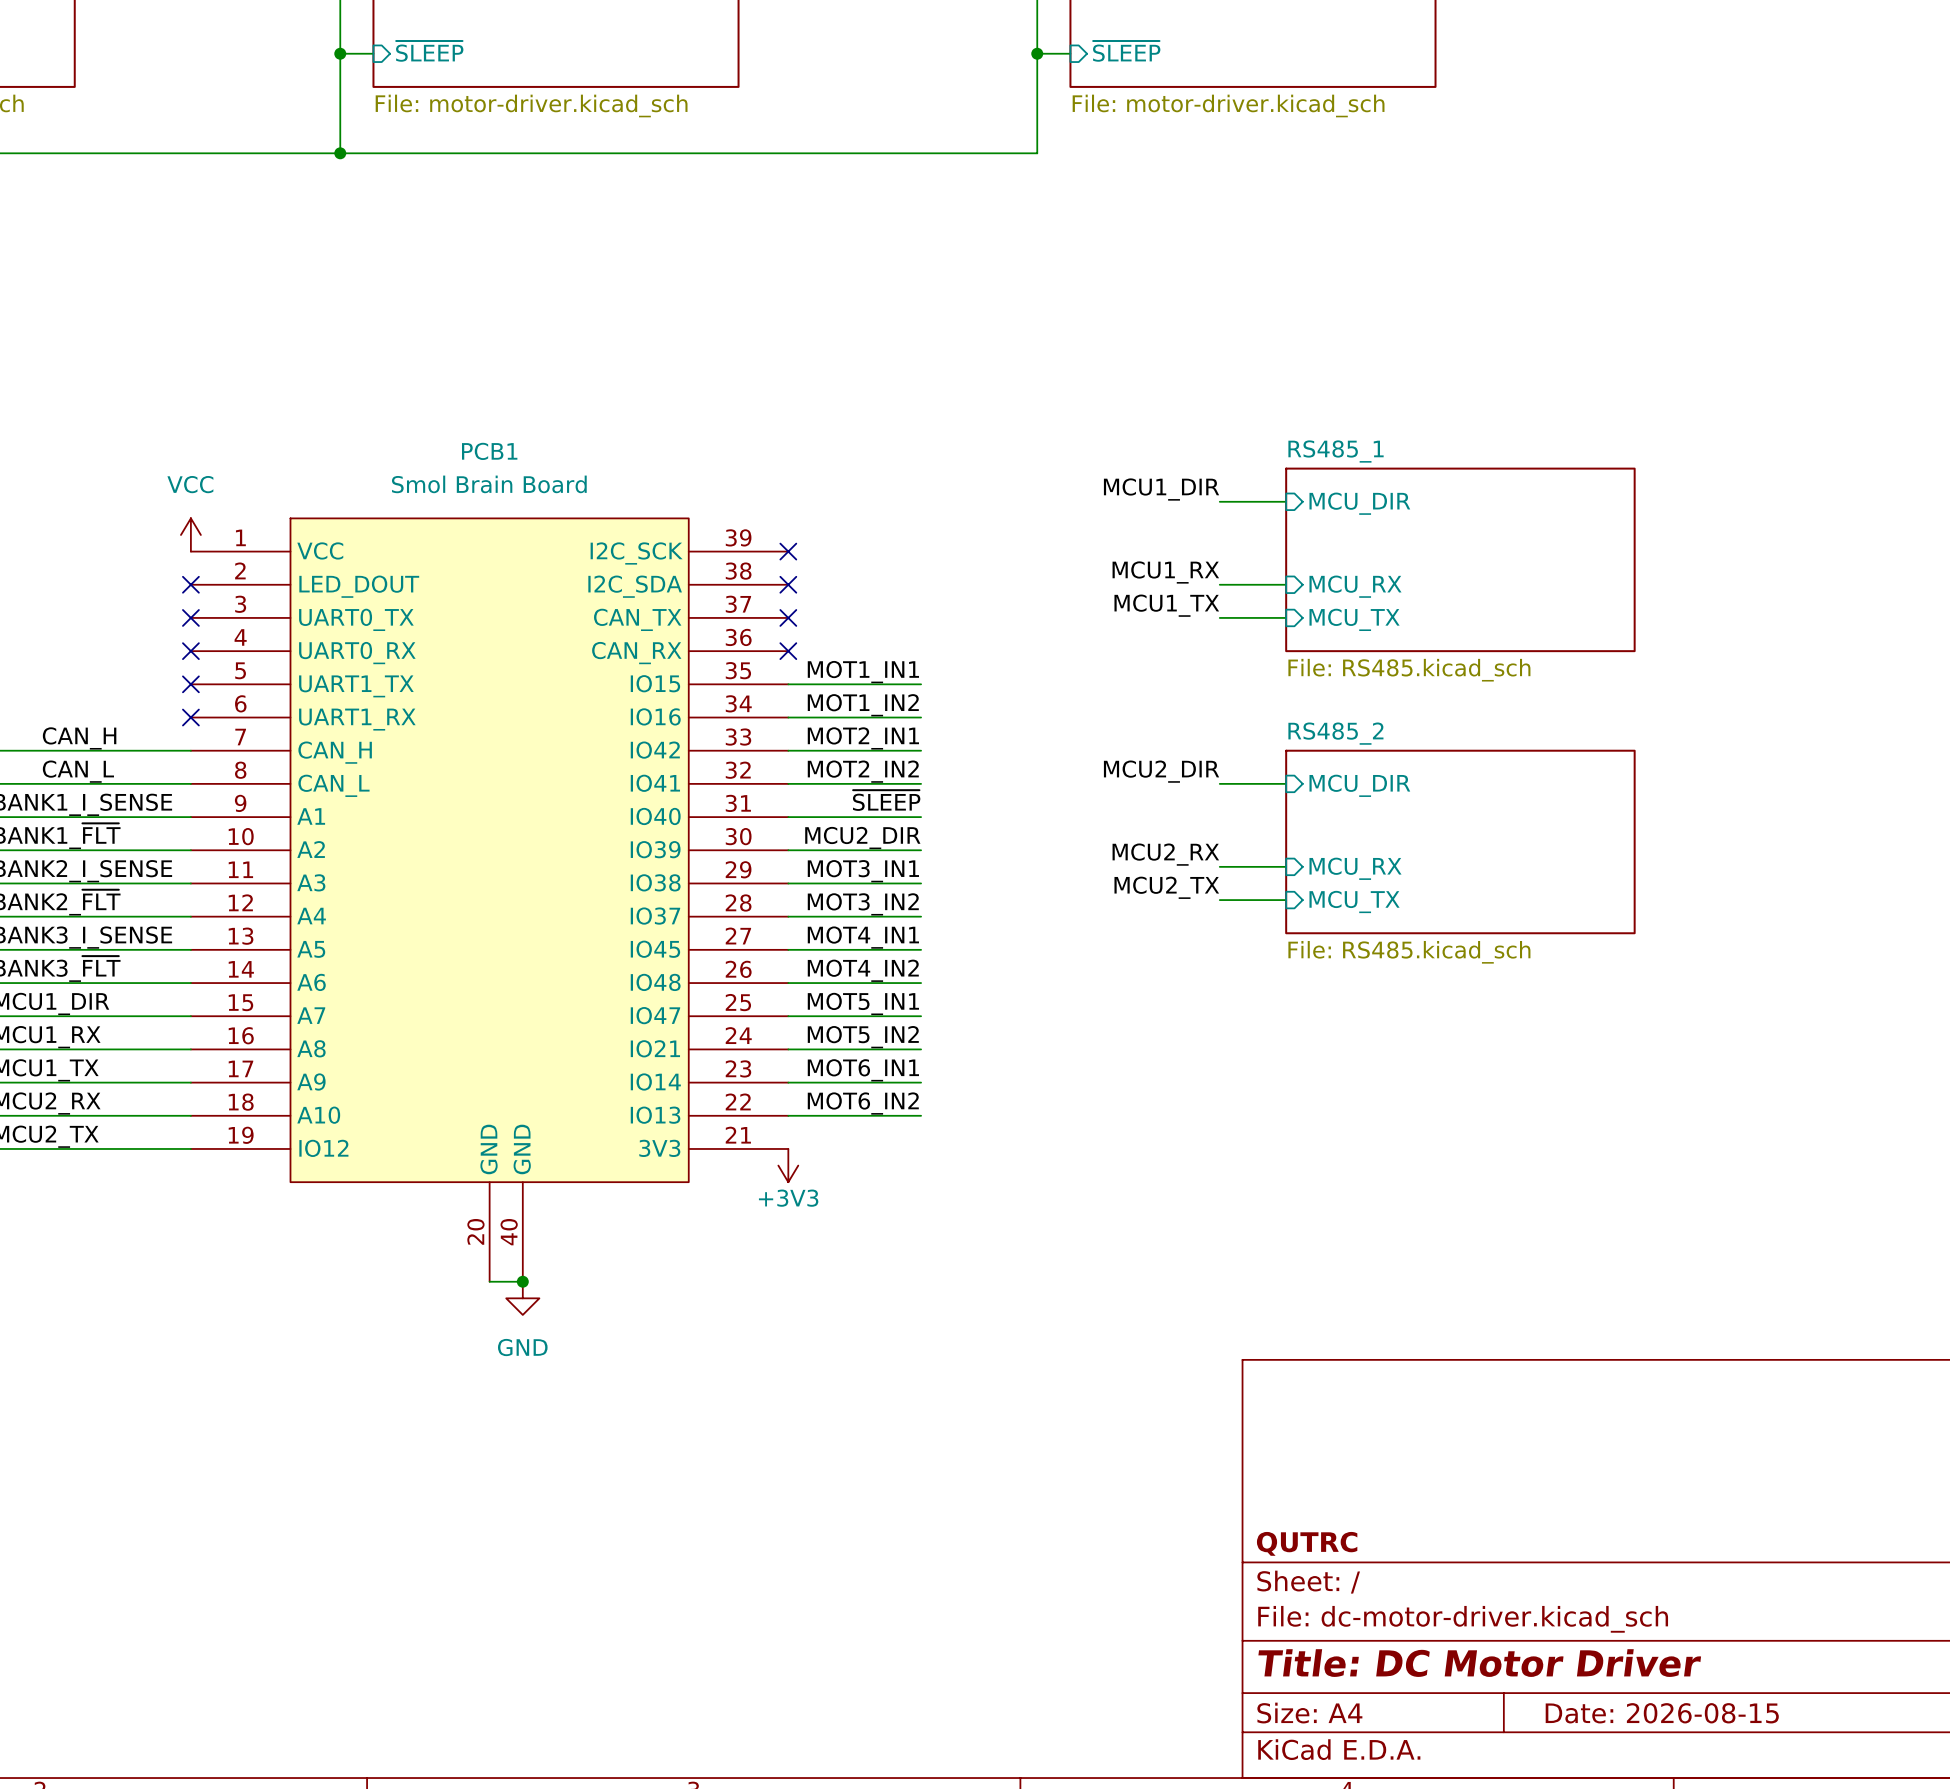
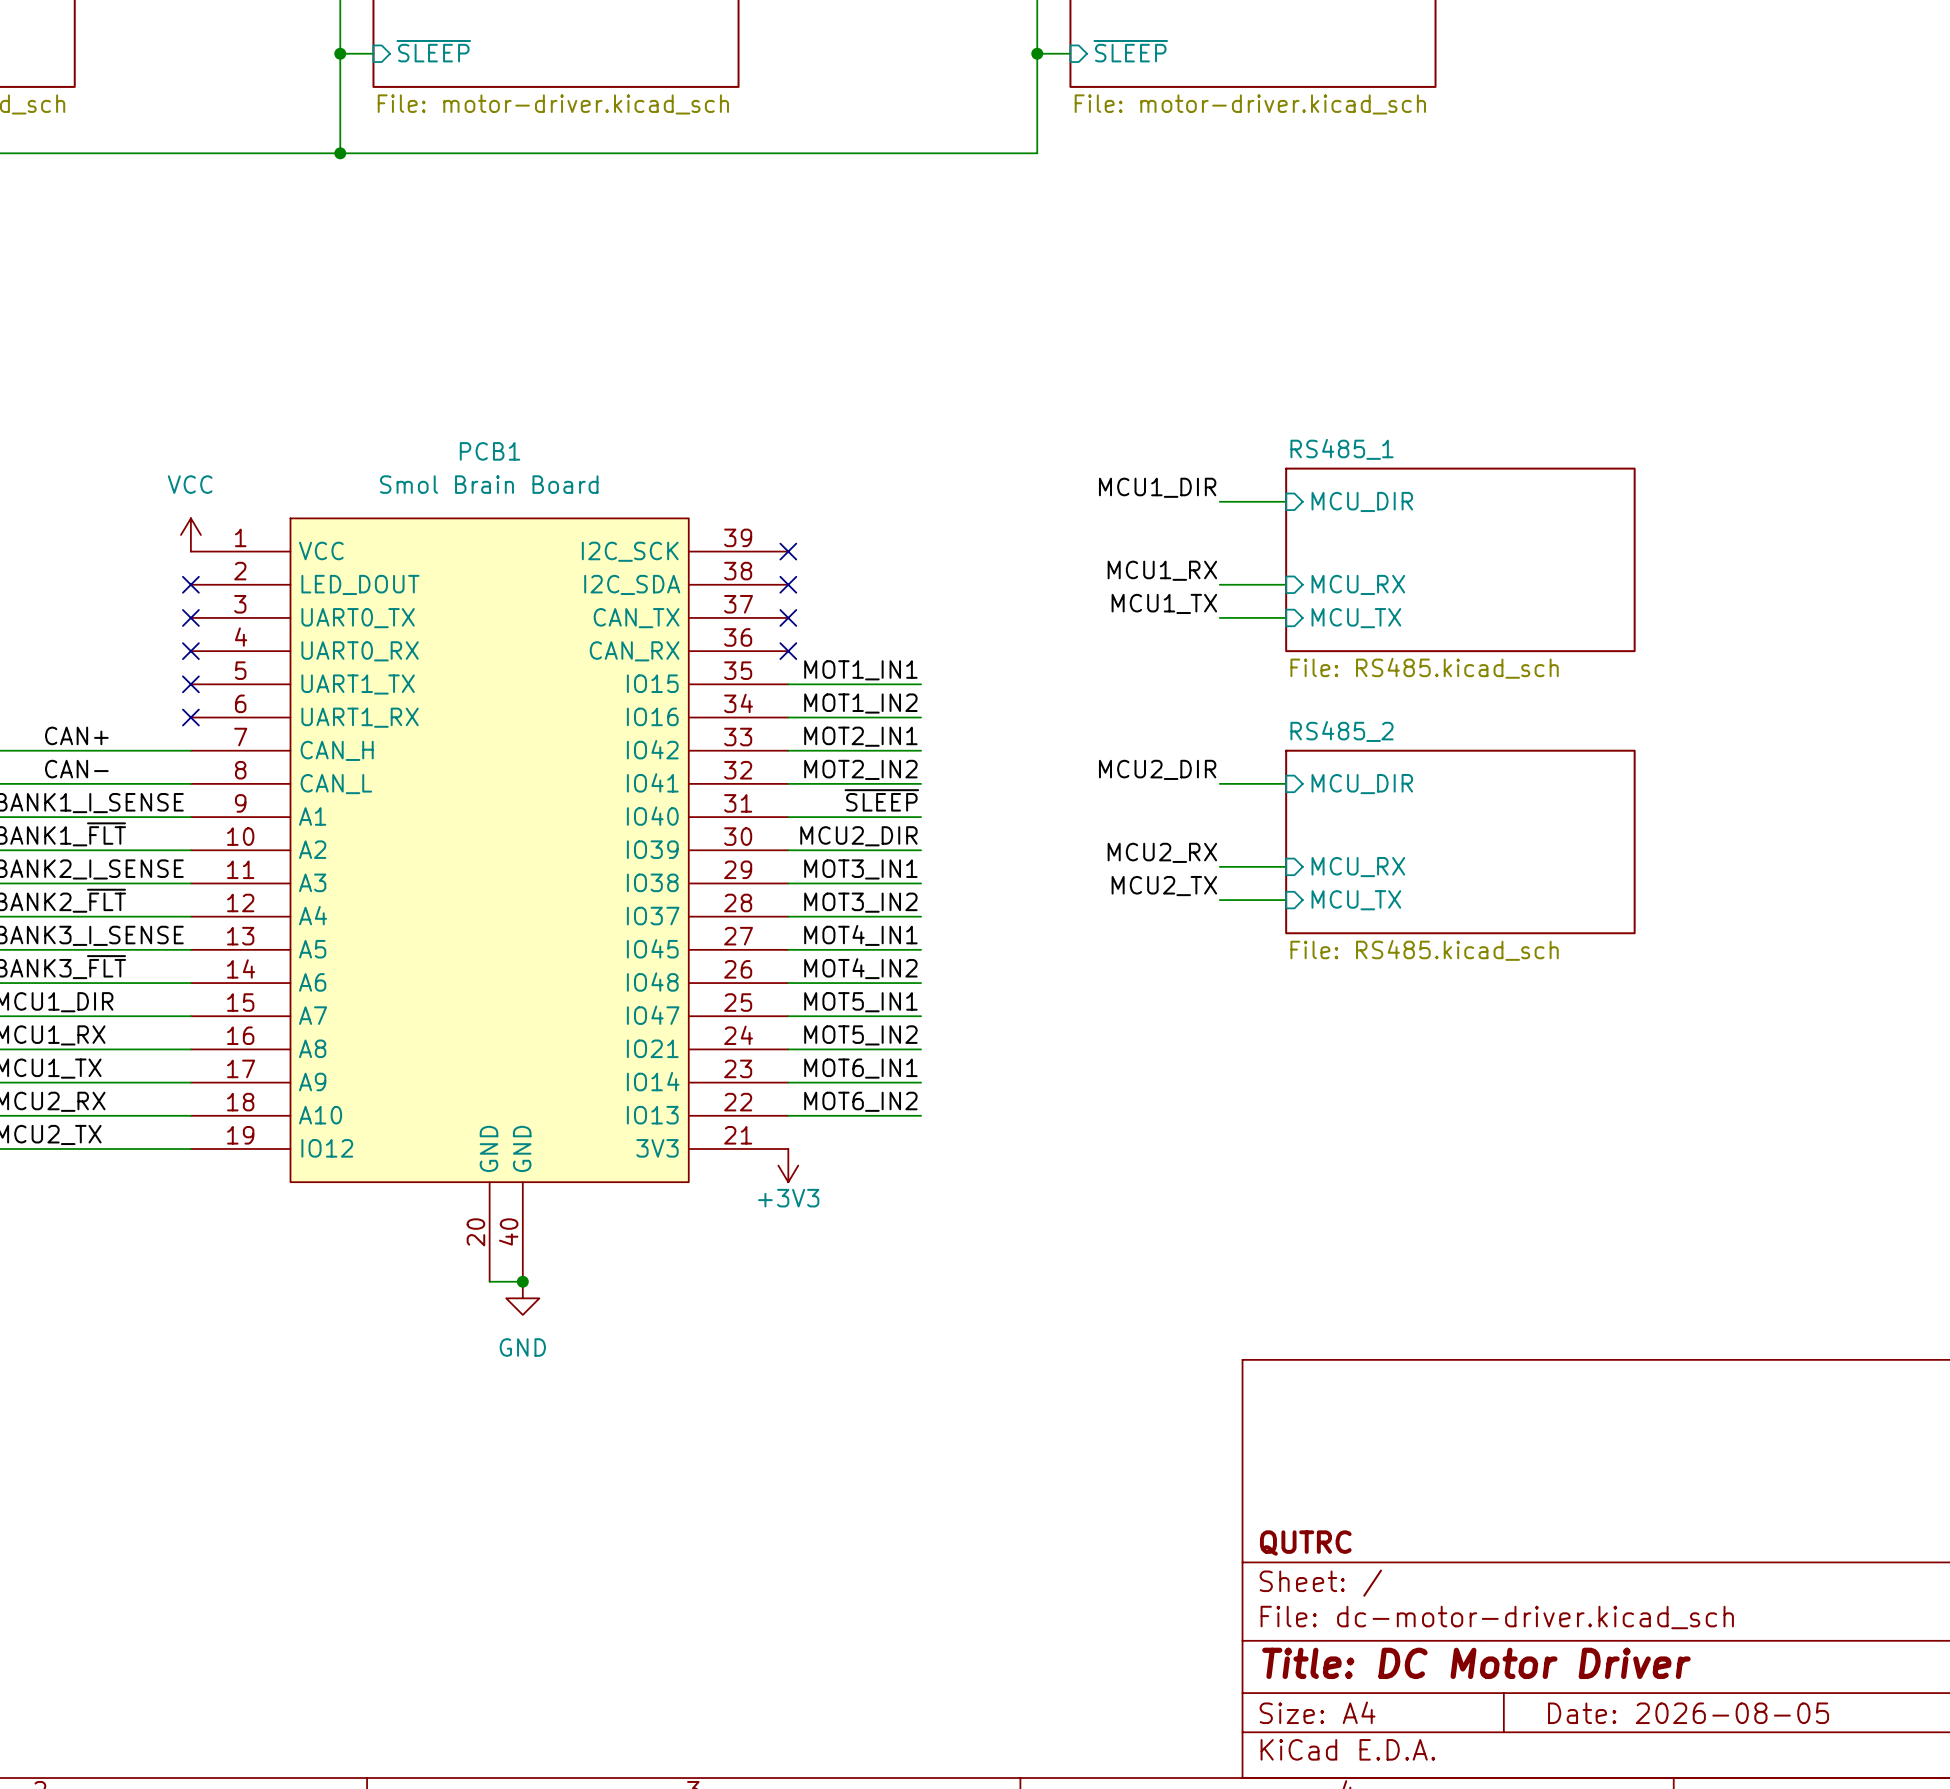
label: CAN_H (79, 738) -> CAN+ (76, 735)
label: CAN_L (78, 771) -> CAN- (76, 769)
title block: Date: 2026-08-15 (1662, 1713) -> Date: 2026-08-05 (1688, 1713)

